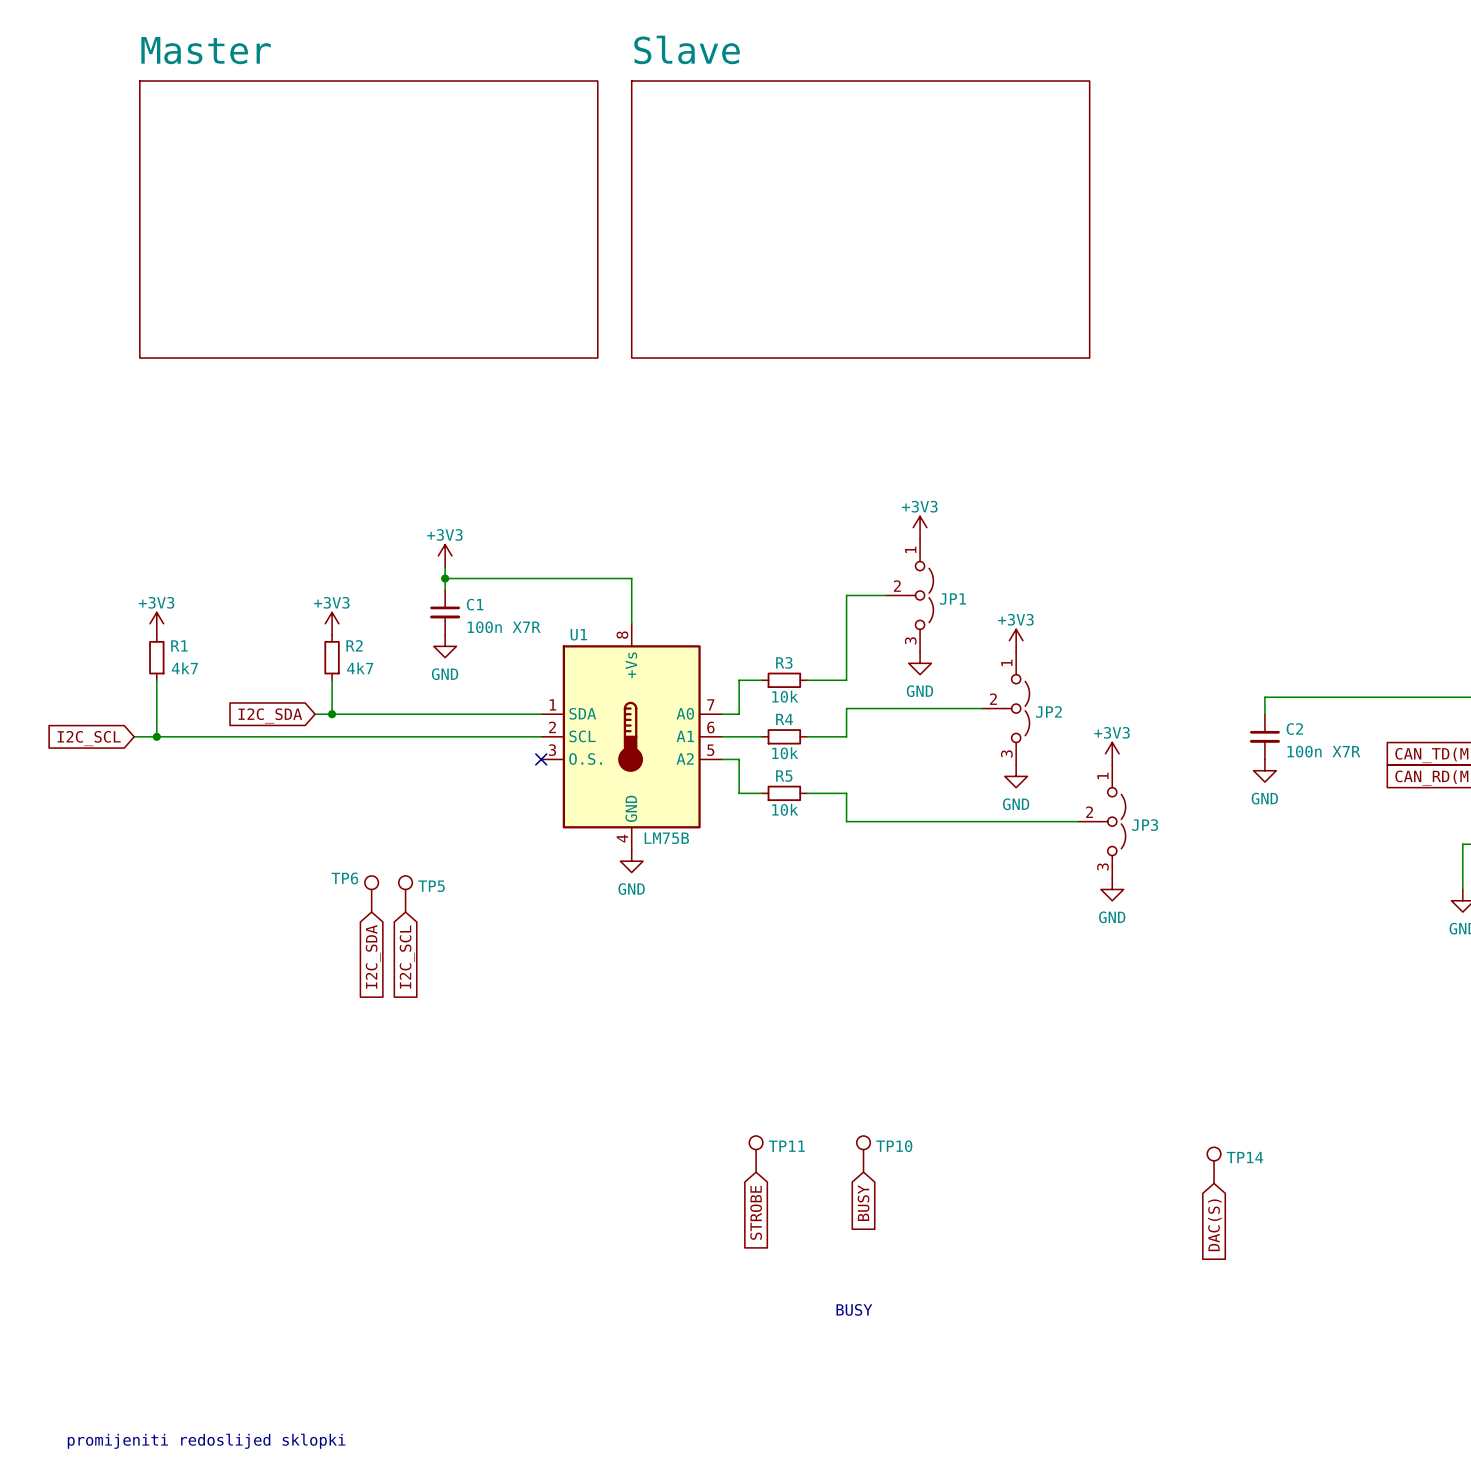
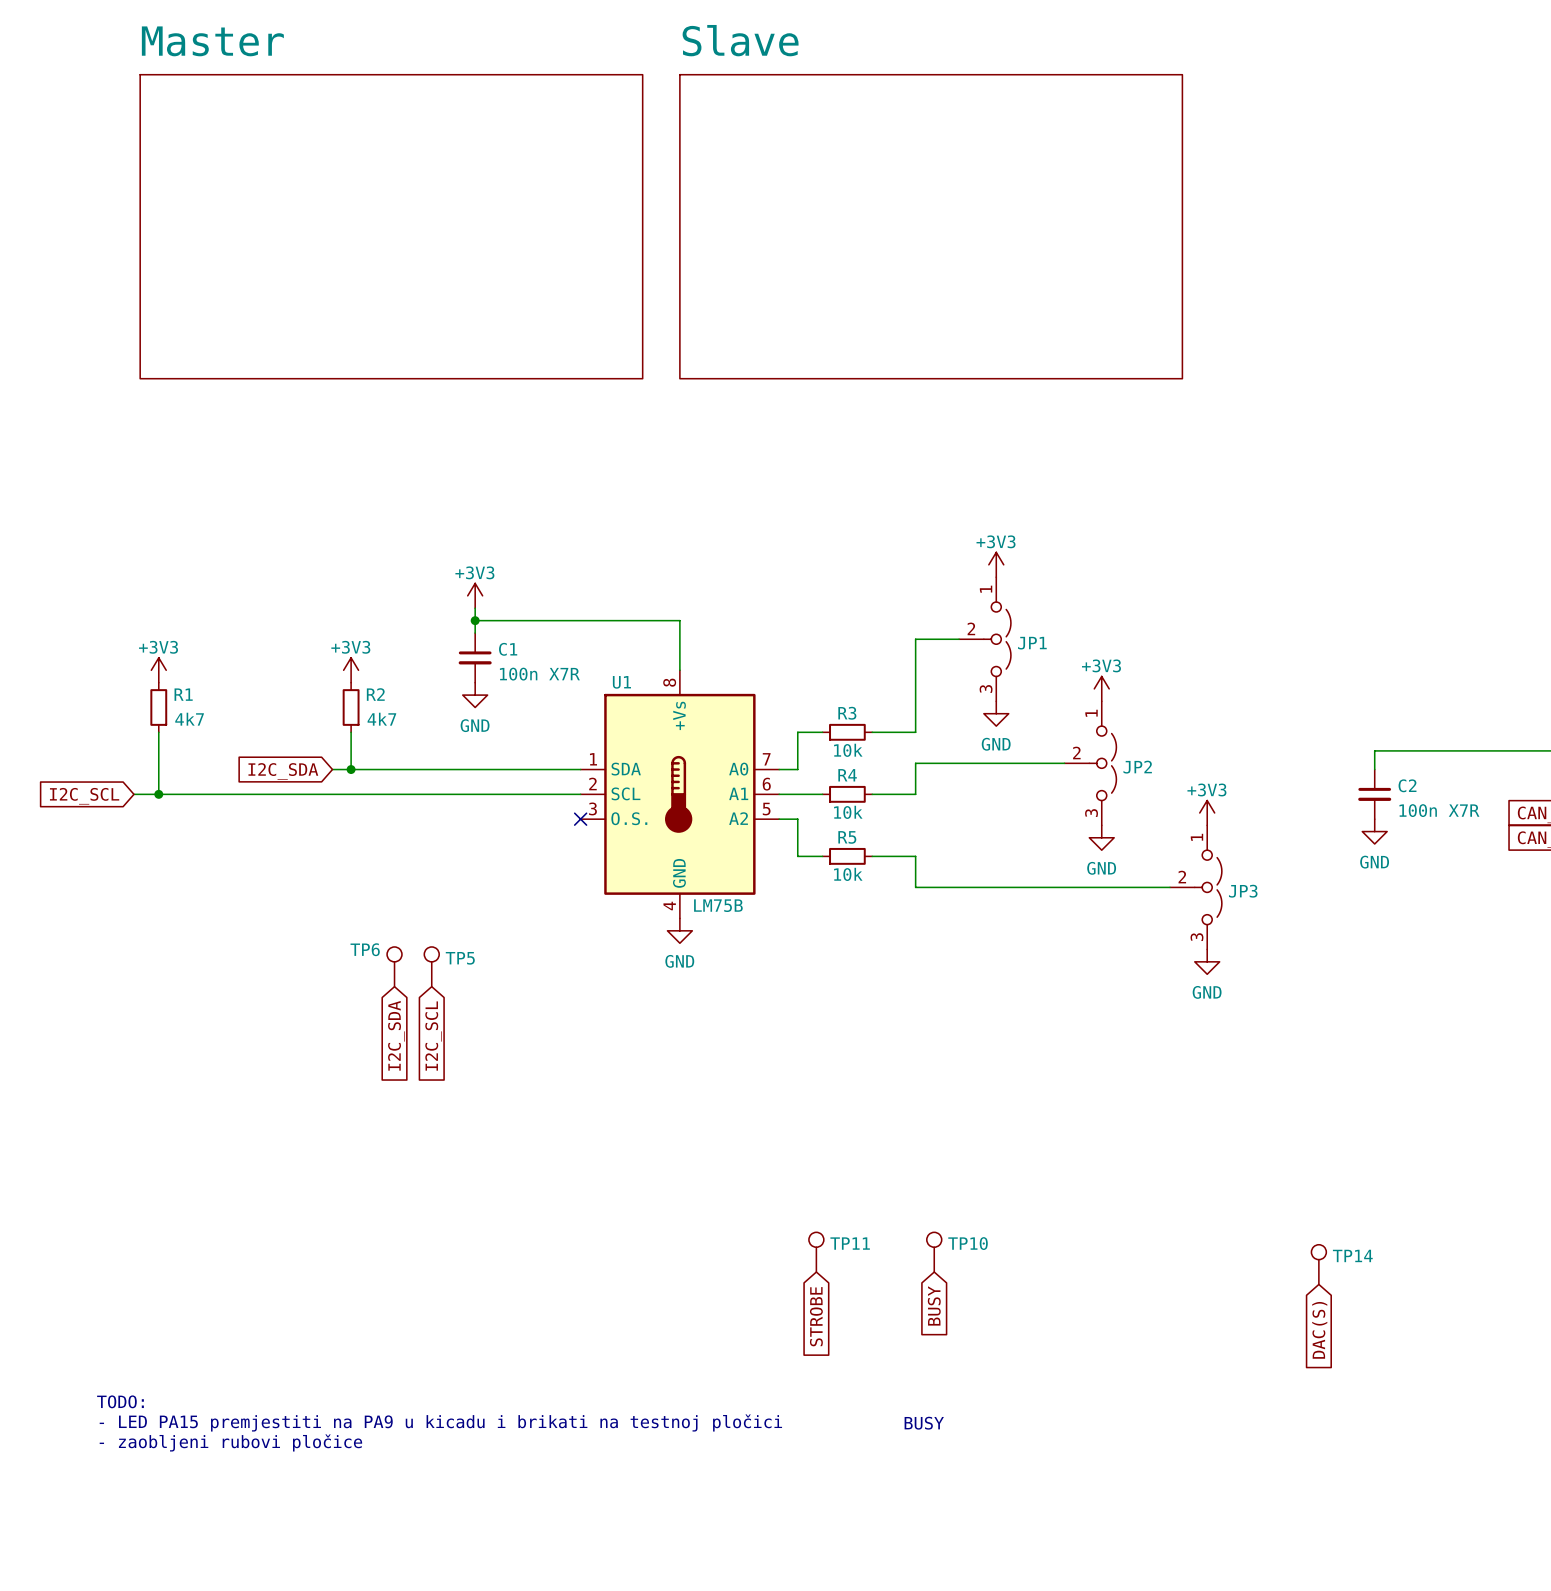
text: none -> TODO: (120, 1401)
text: none -> - LED PA15 premjestiti na PA9 u kicadu i brikati na testnoj pločici (440, 1422)
text: none -> - zaobljeni rubovi pločice (230, 1442)
text: promijeniti redoslijed sklopki (206, 1441) -> none

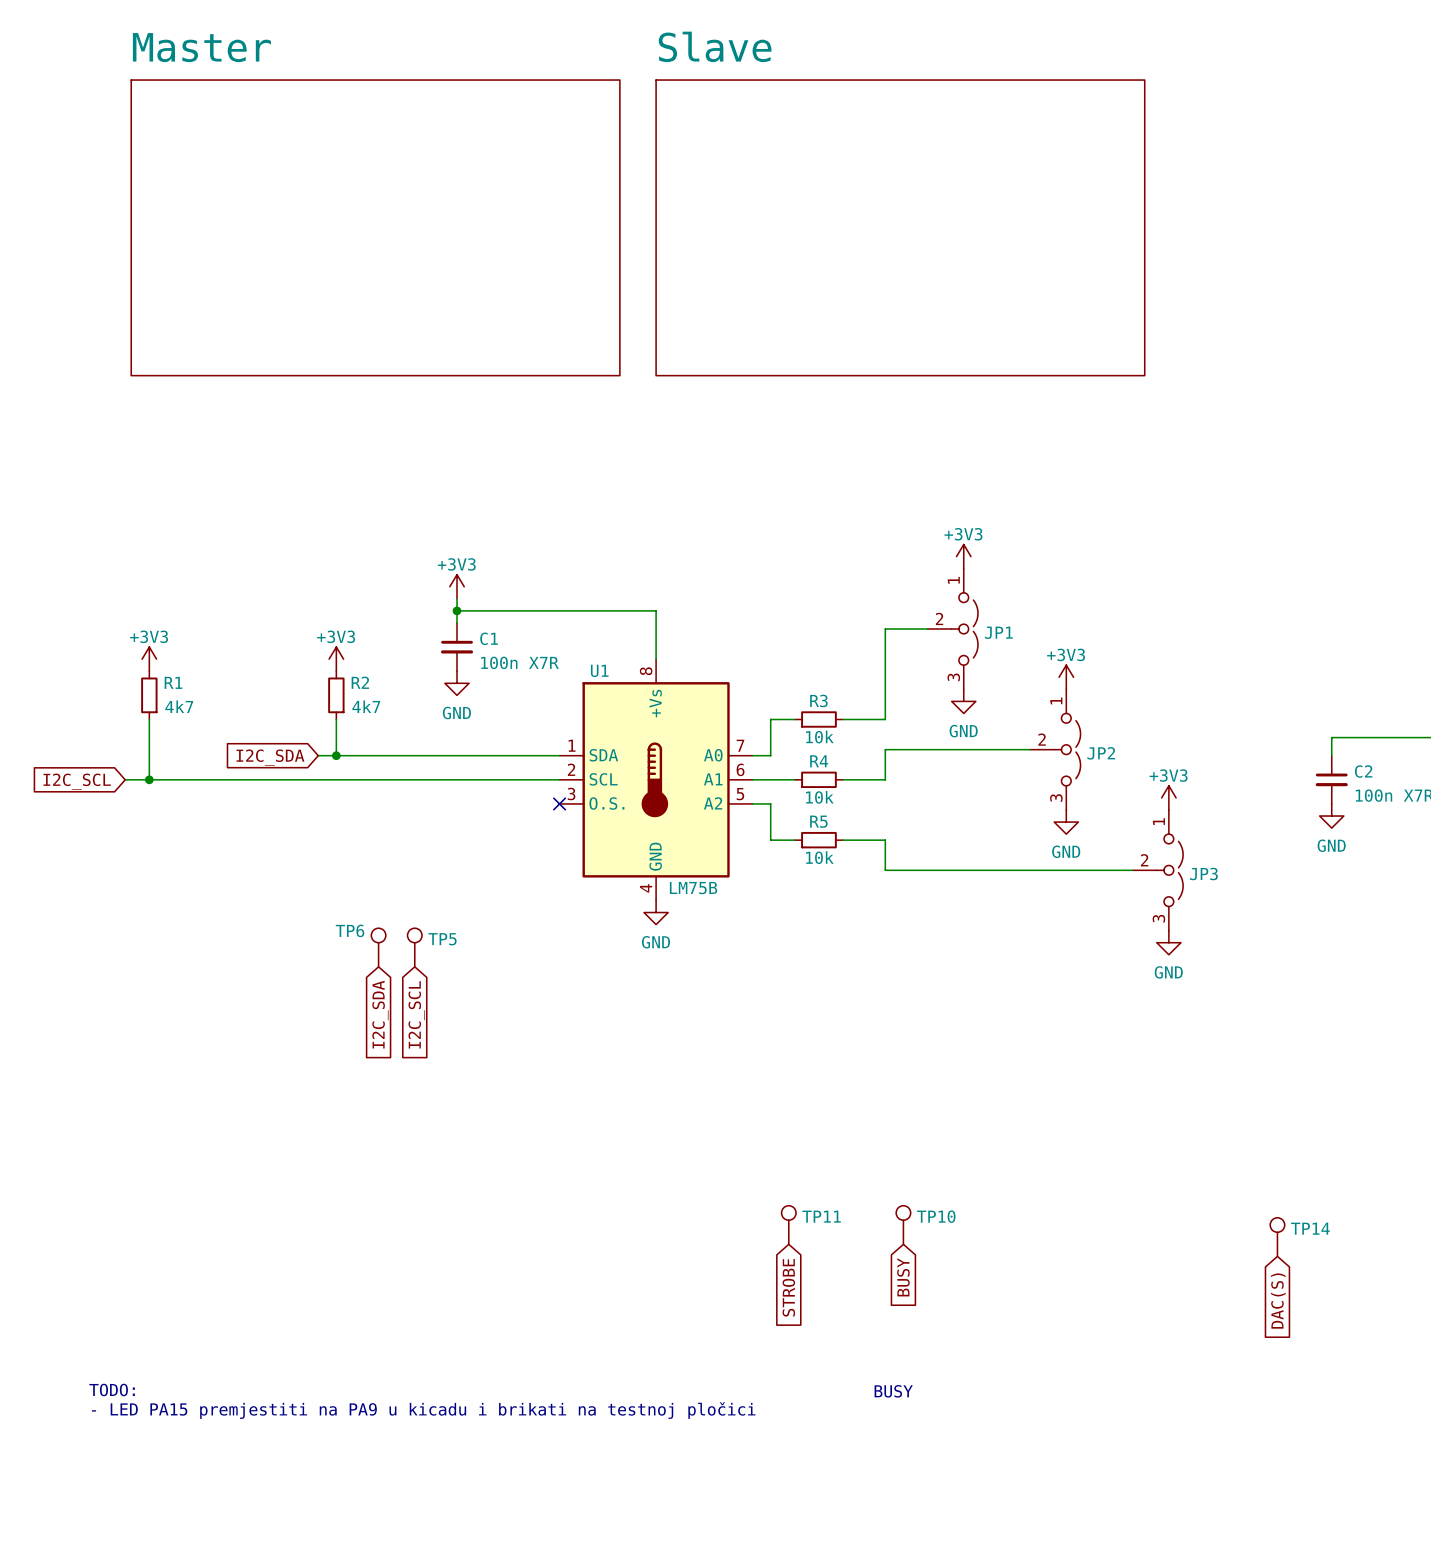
text: TODO: (120, 1401) -> none
text: - LED PA15 premjestiti na PA9 u kicadu i brikati na testnoj pločici (440, 1422) -> TODO: (112, 1389)
text: - zaobljeni rubovi pločice (230, 1442) -> - LED PA15 premjestiti na PA9 u kicadu i brikati na testnoj pločici (423, 1410)

